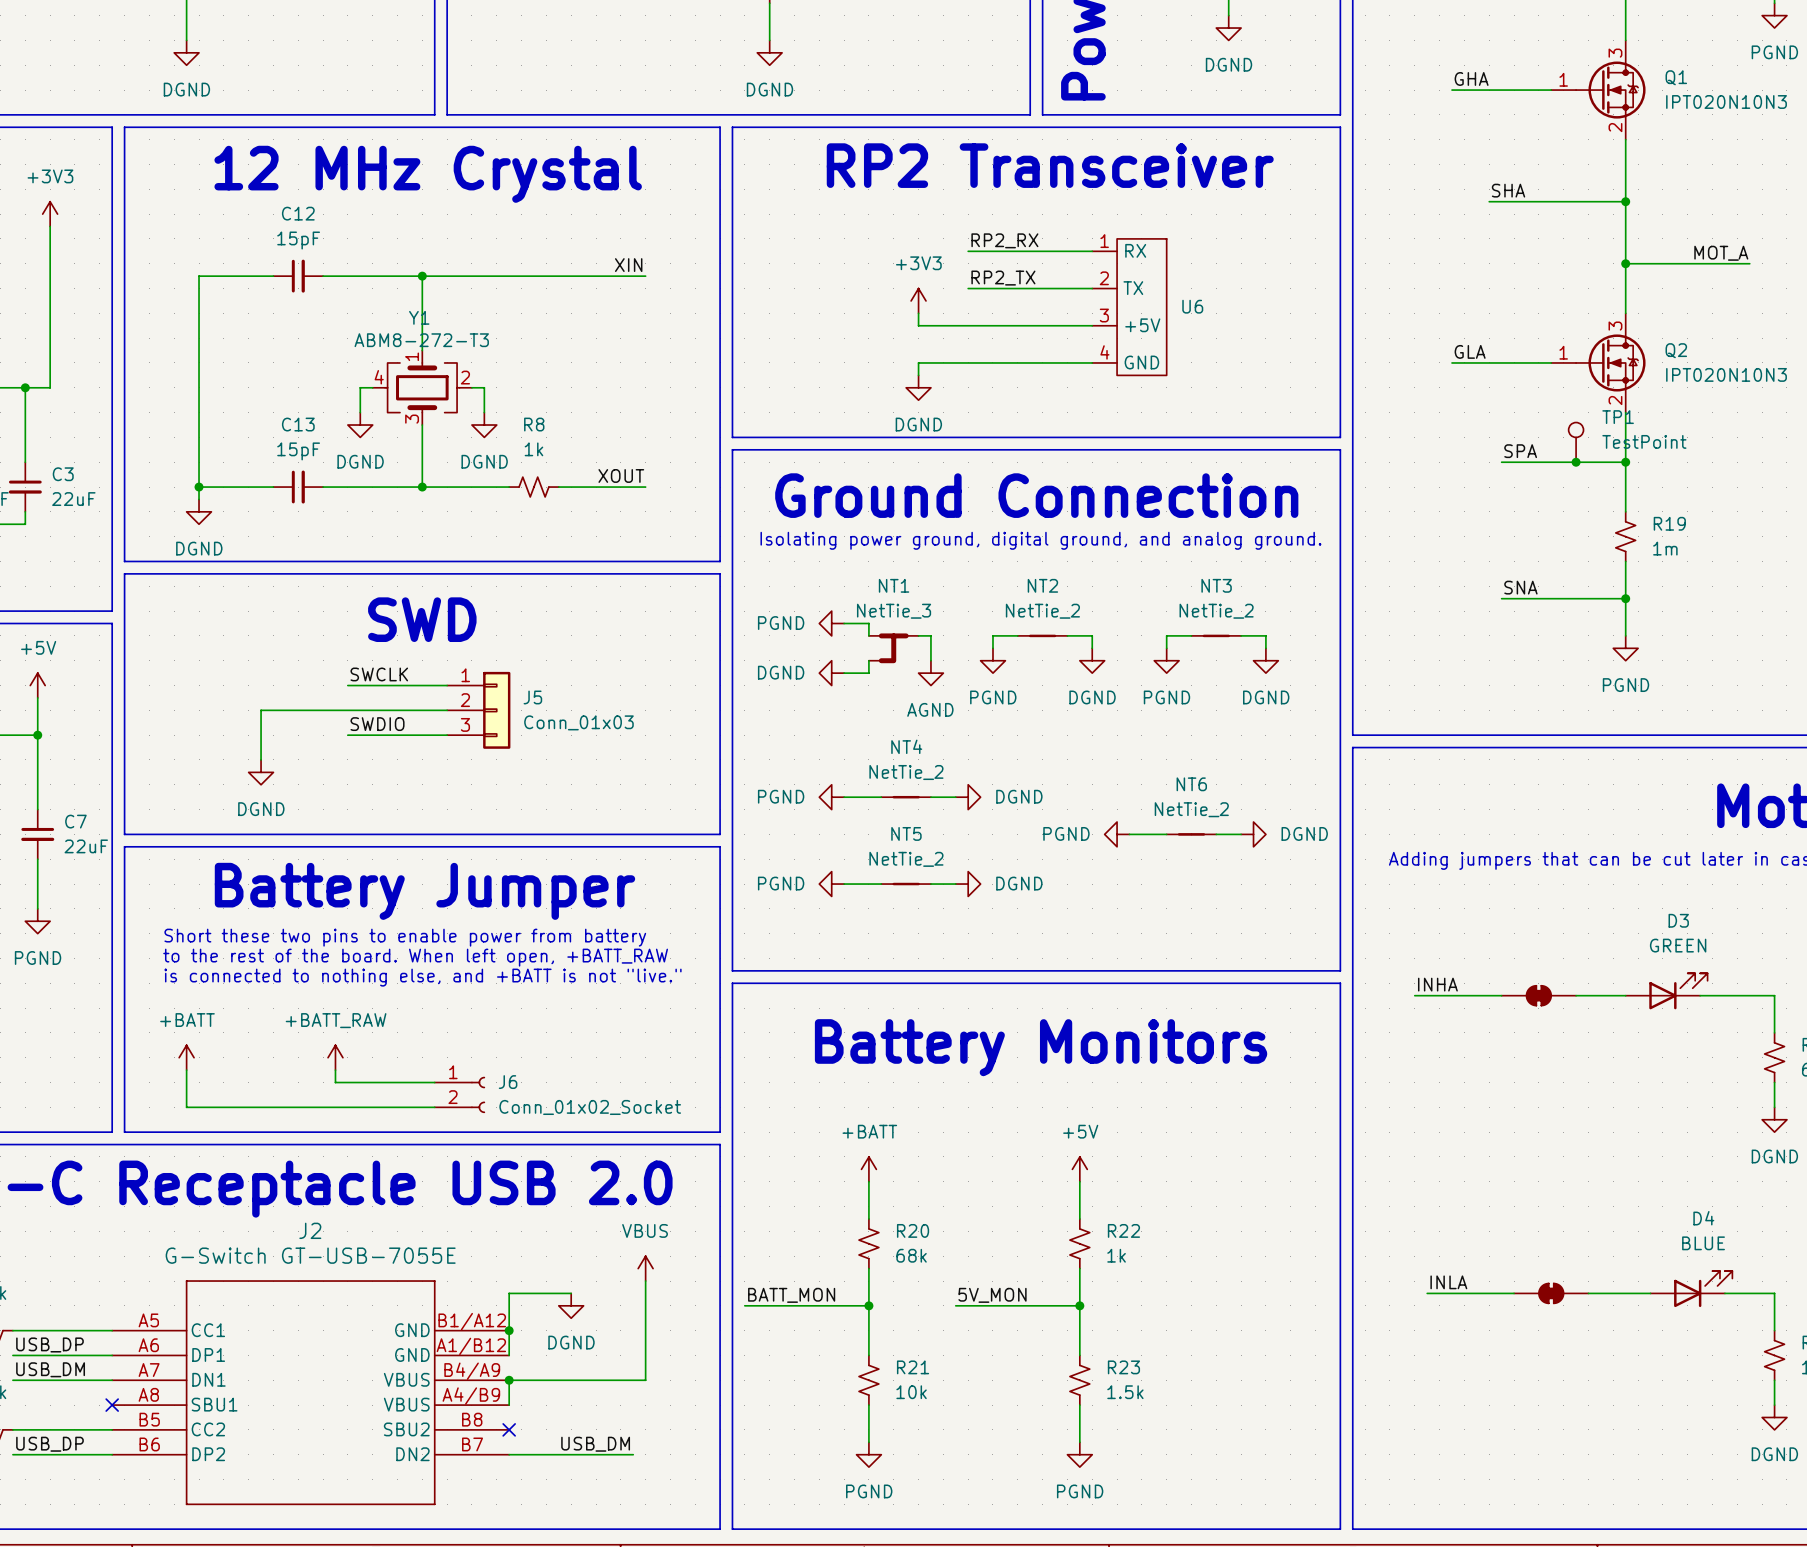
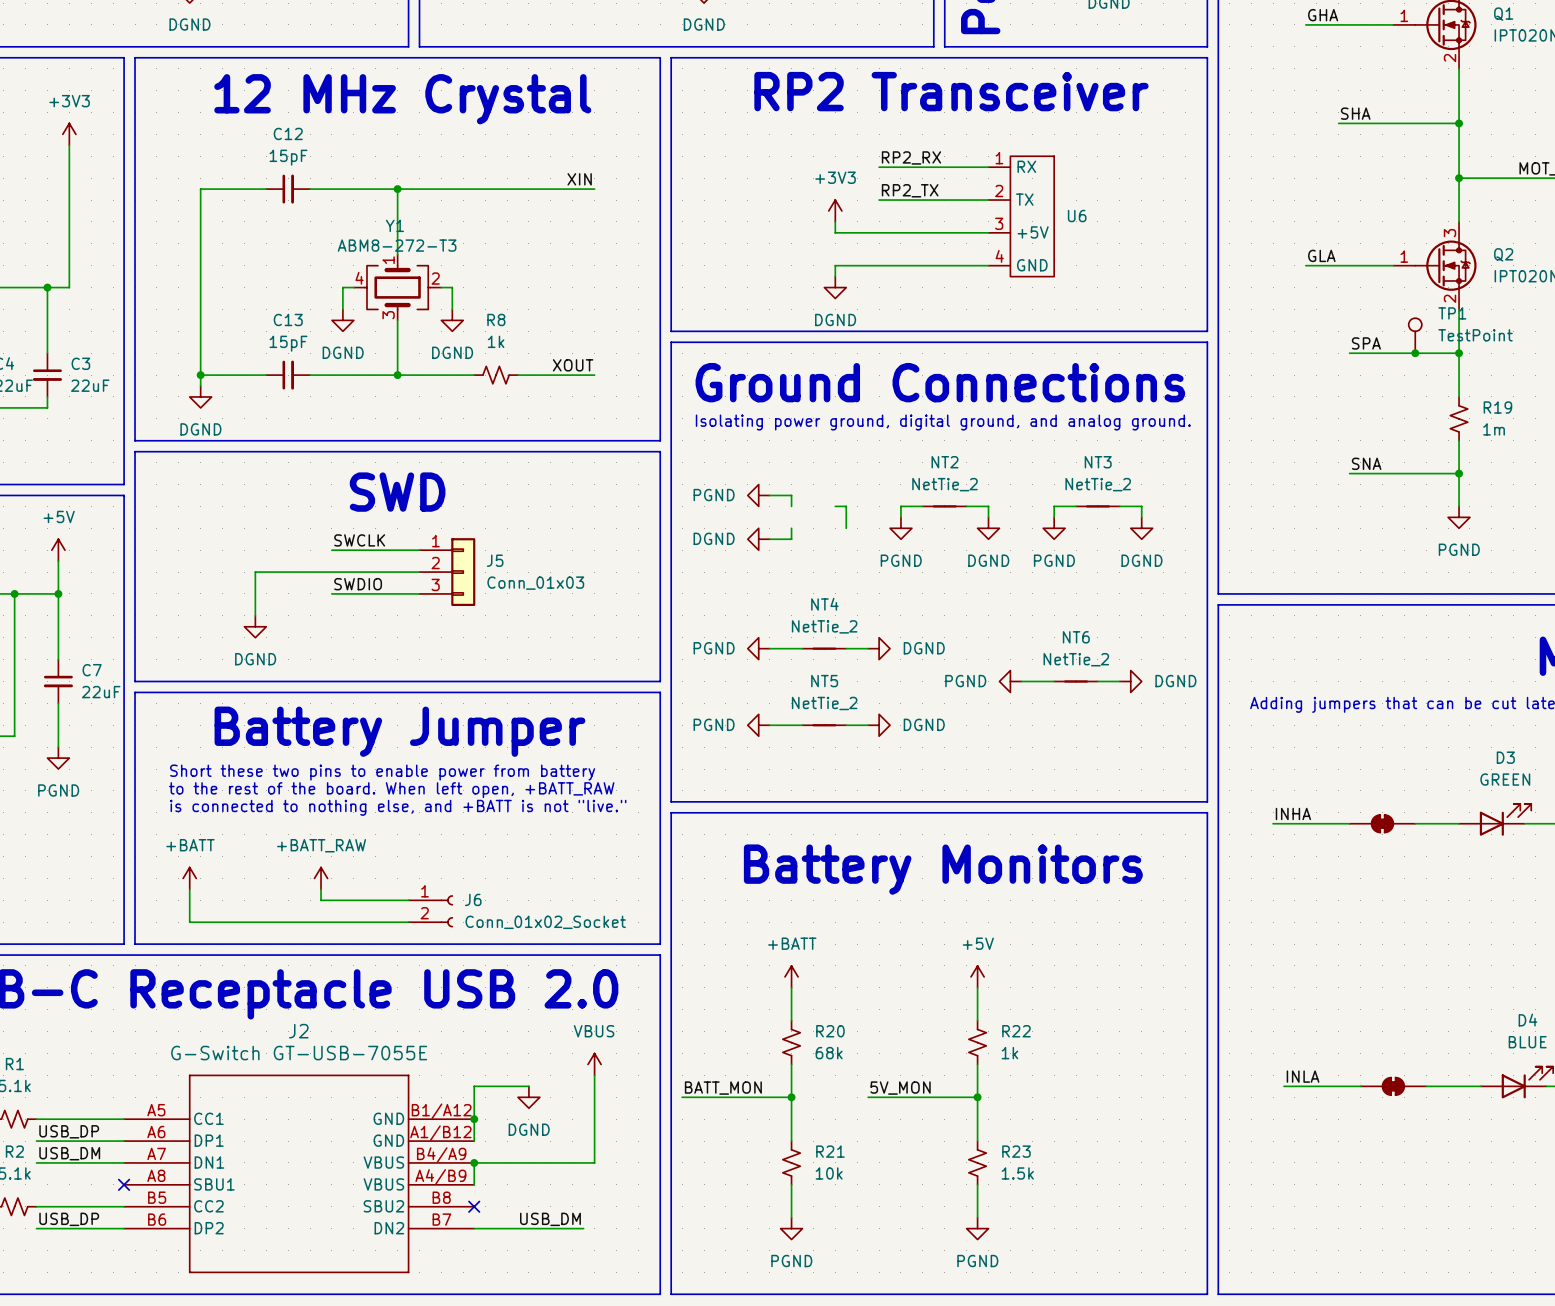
text: Ground Connection (1036, 495) -> Ground Connections (940, 382)
NT1: NetTie_3 (893, 648) -> none
power symbol: AGND (930, 673) -> none

